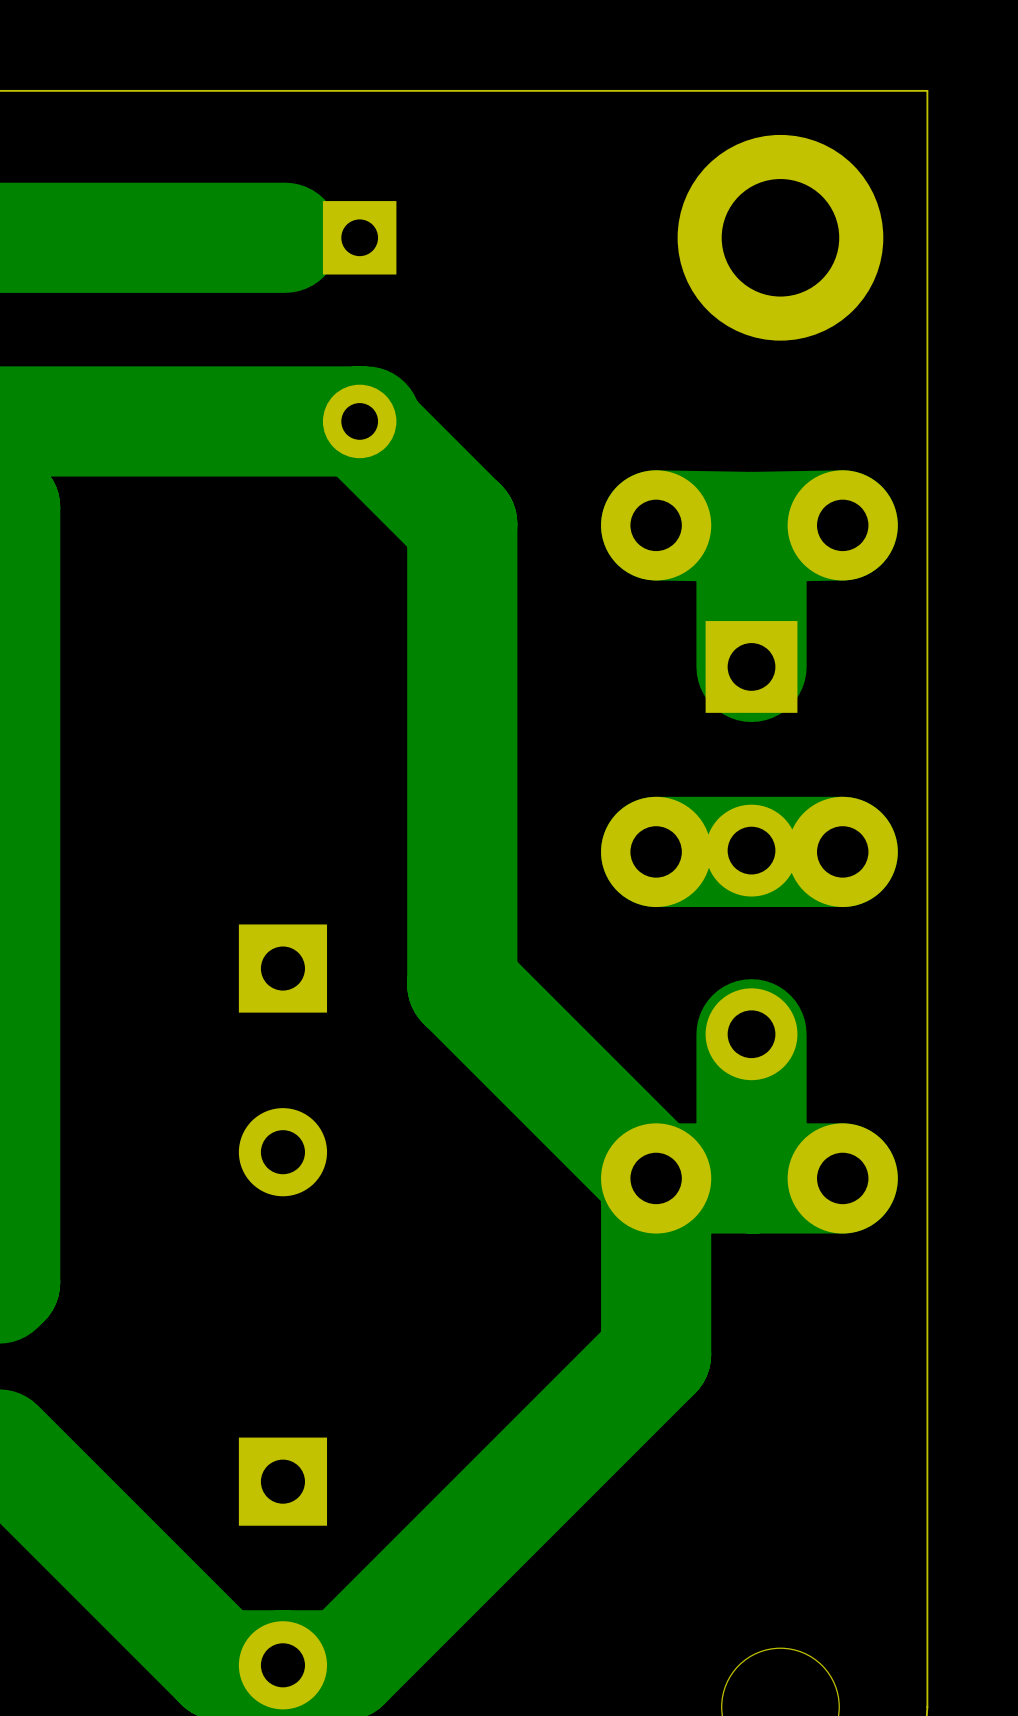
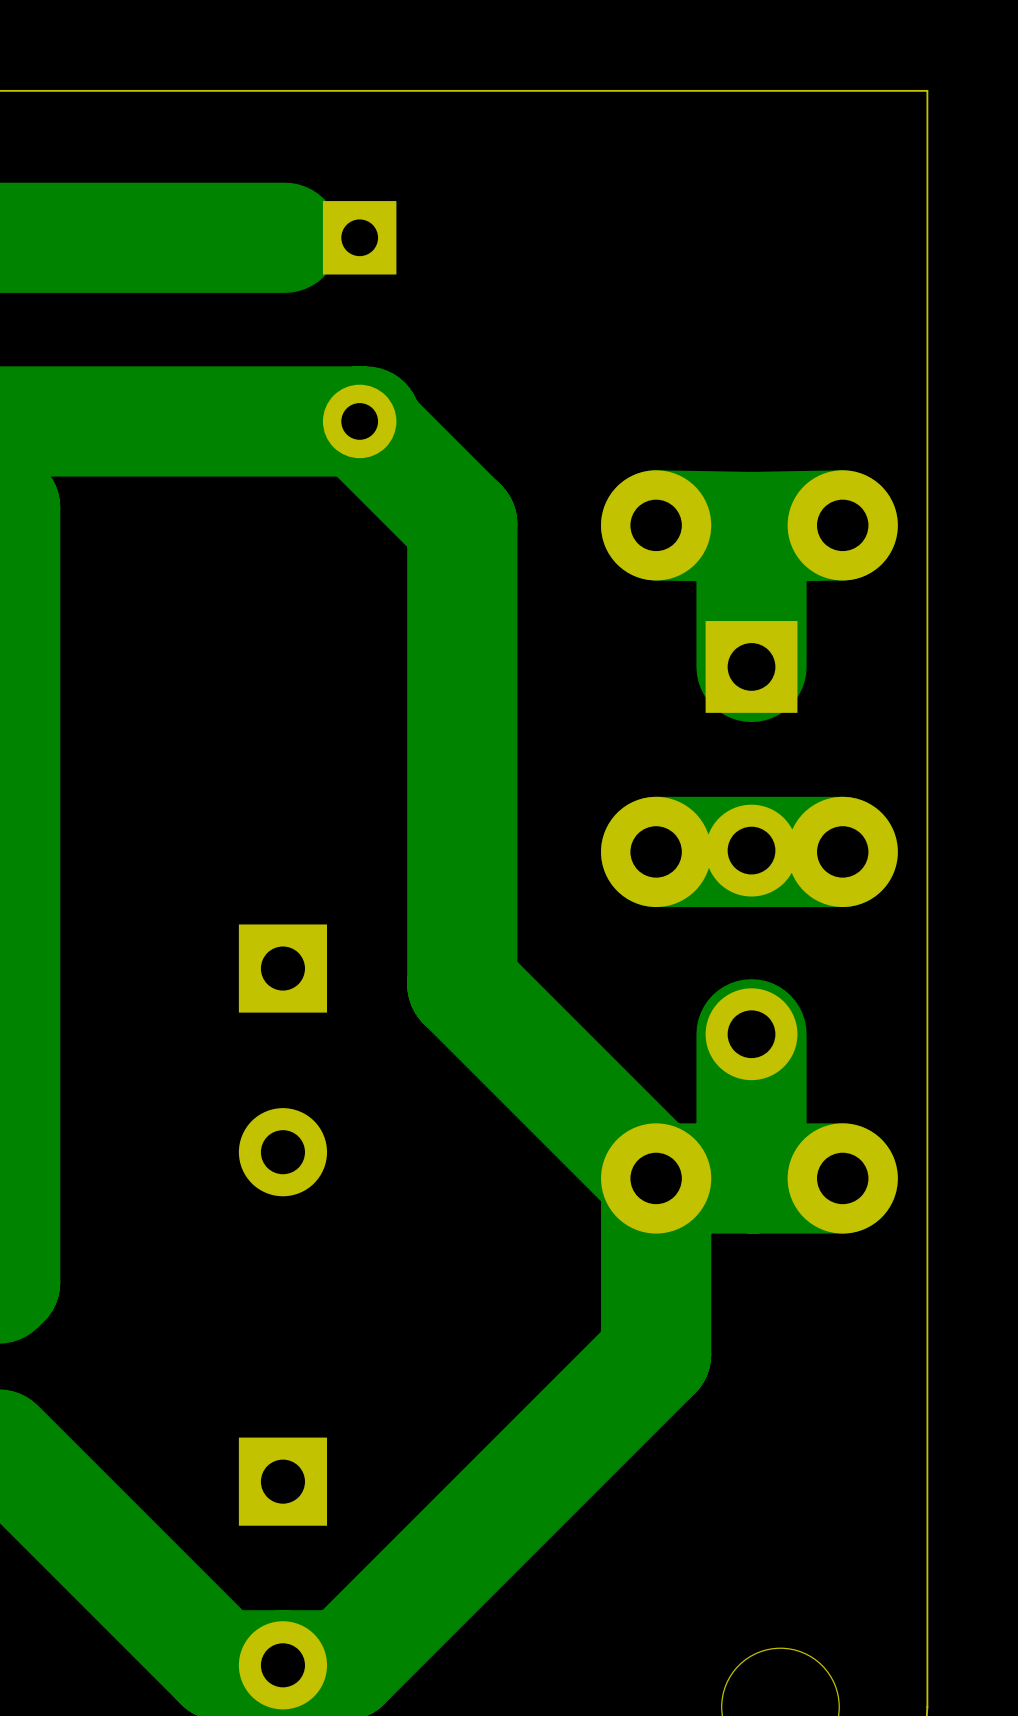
part: (780, 237) -> none

